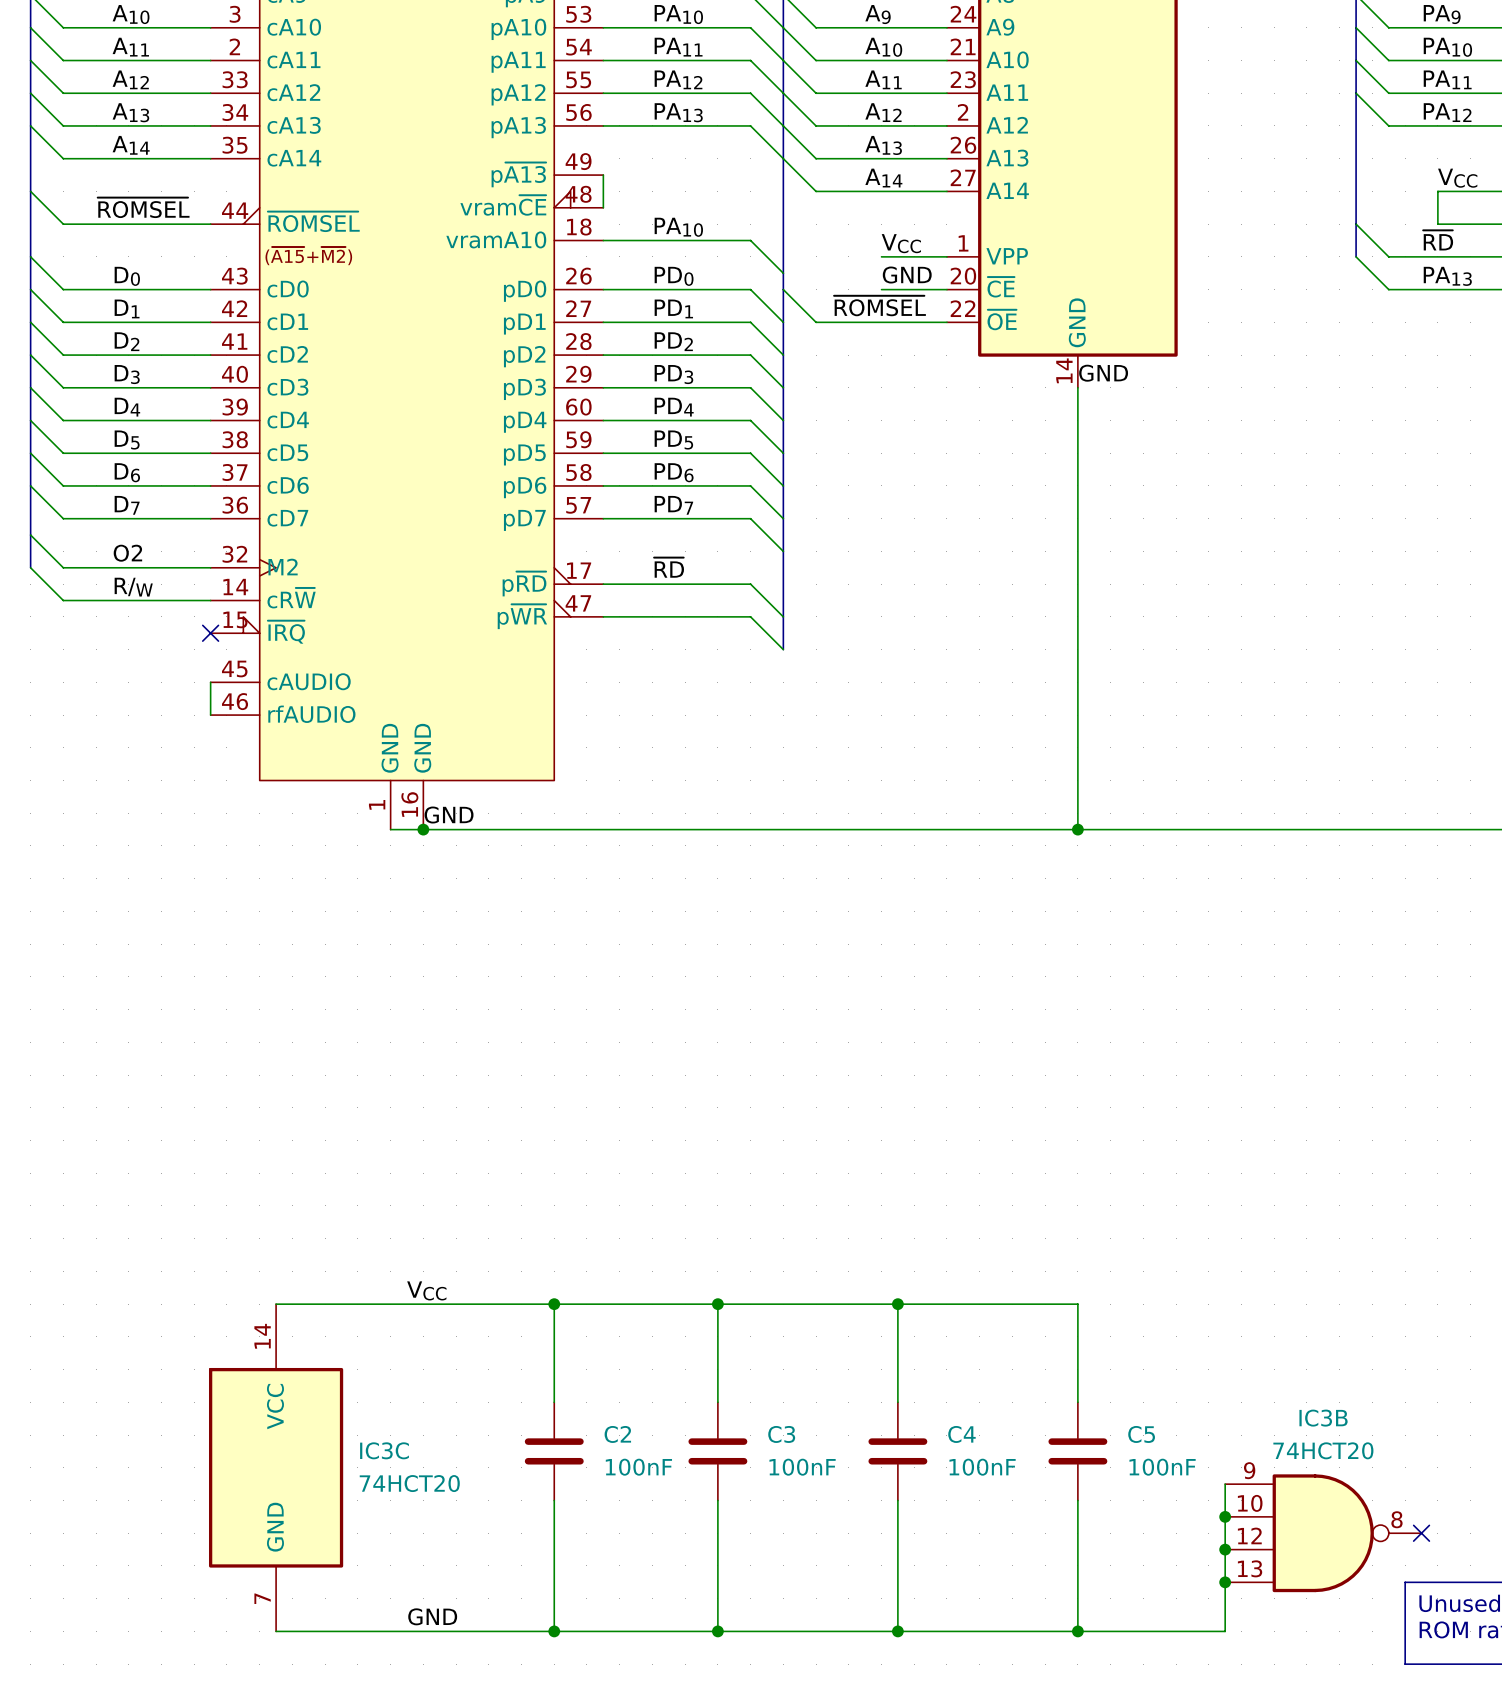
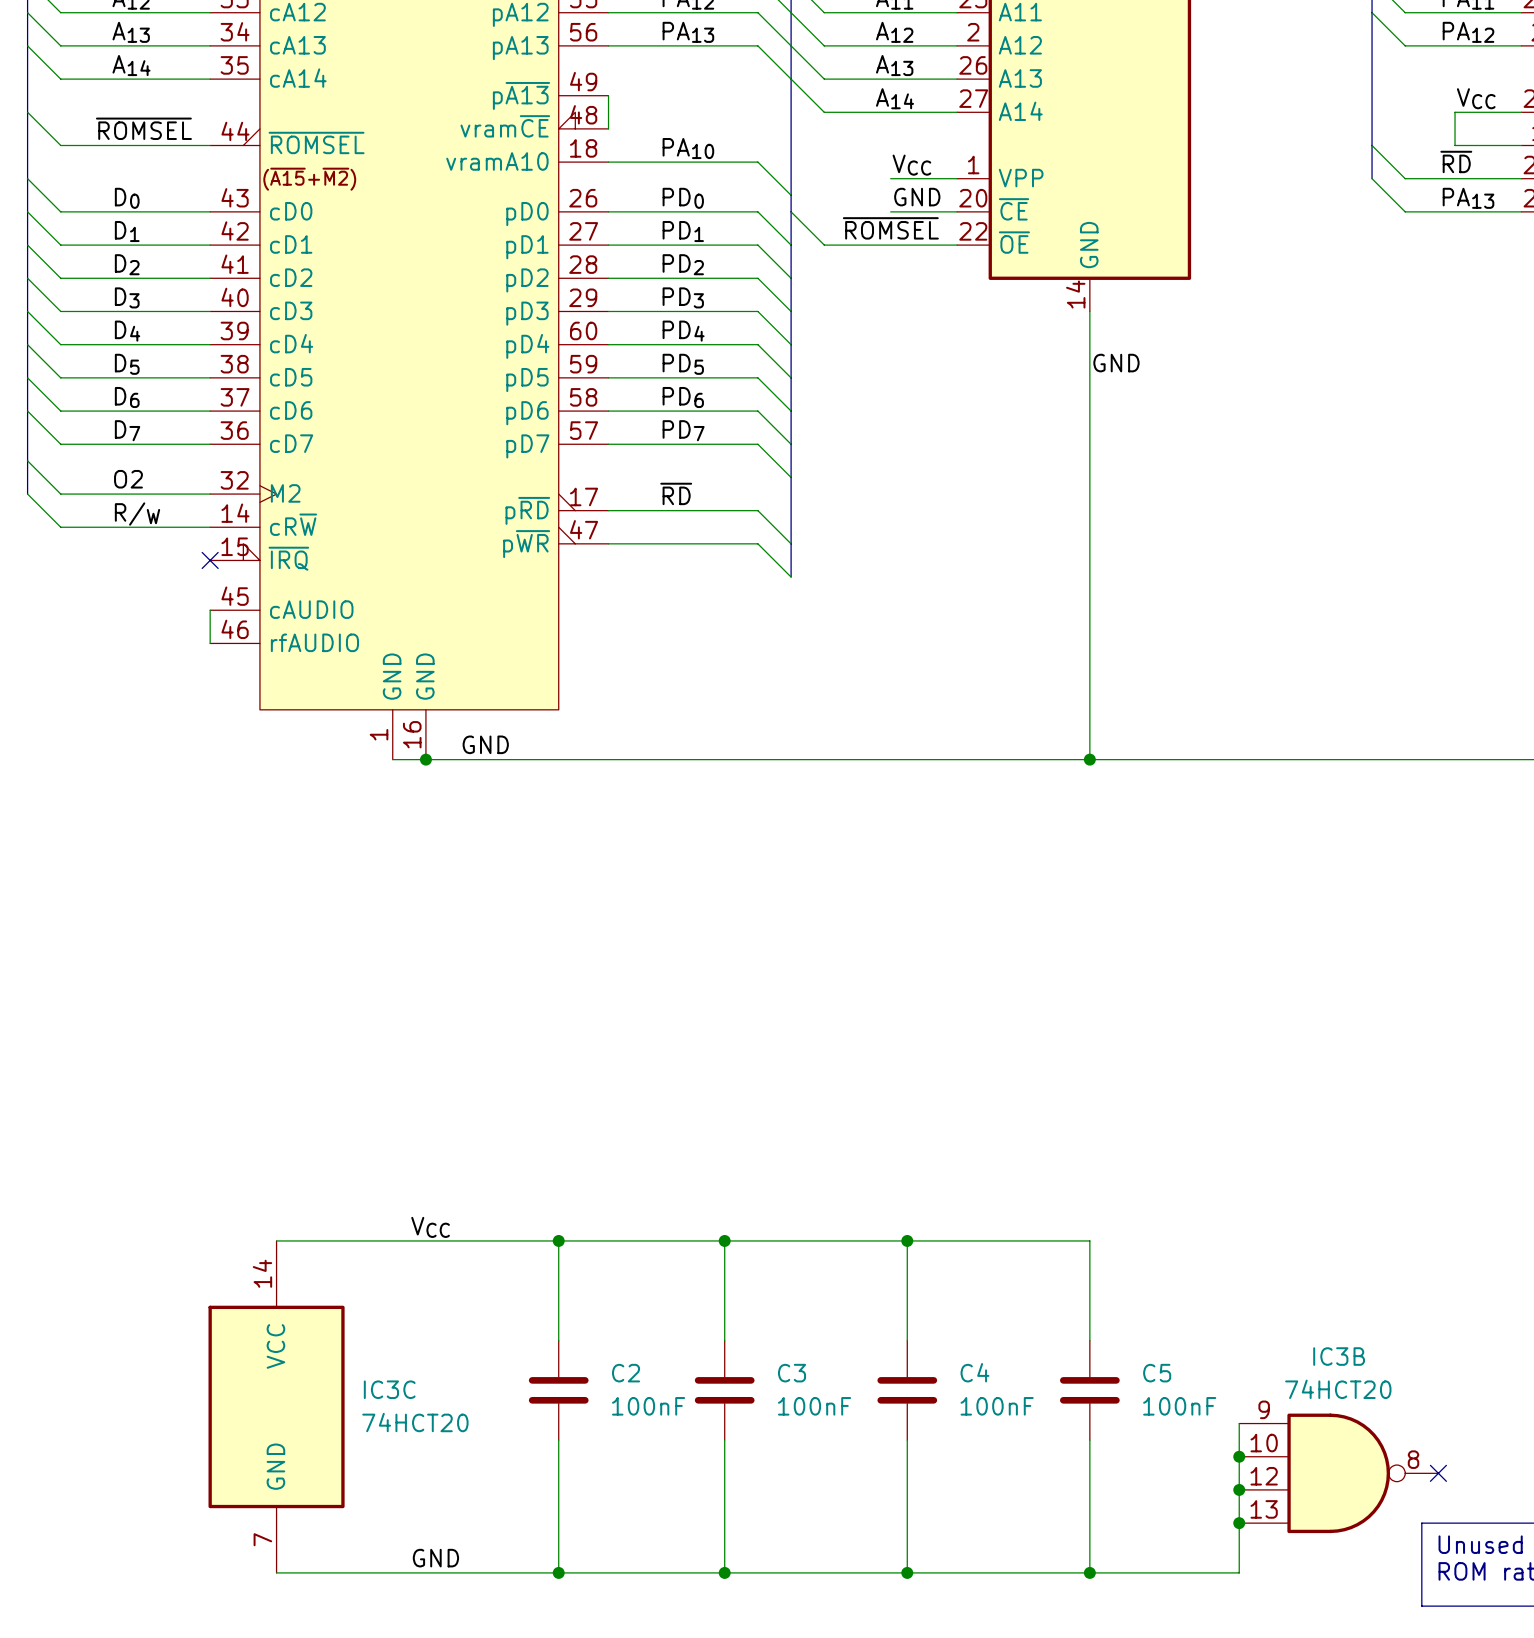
label position: GND (1103, 373) -> GND (1116, 363)
label position: GND (449, 815) -> GND (485, 744)

